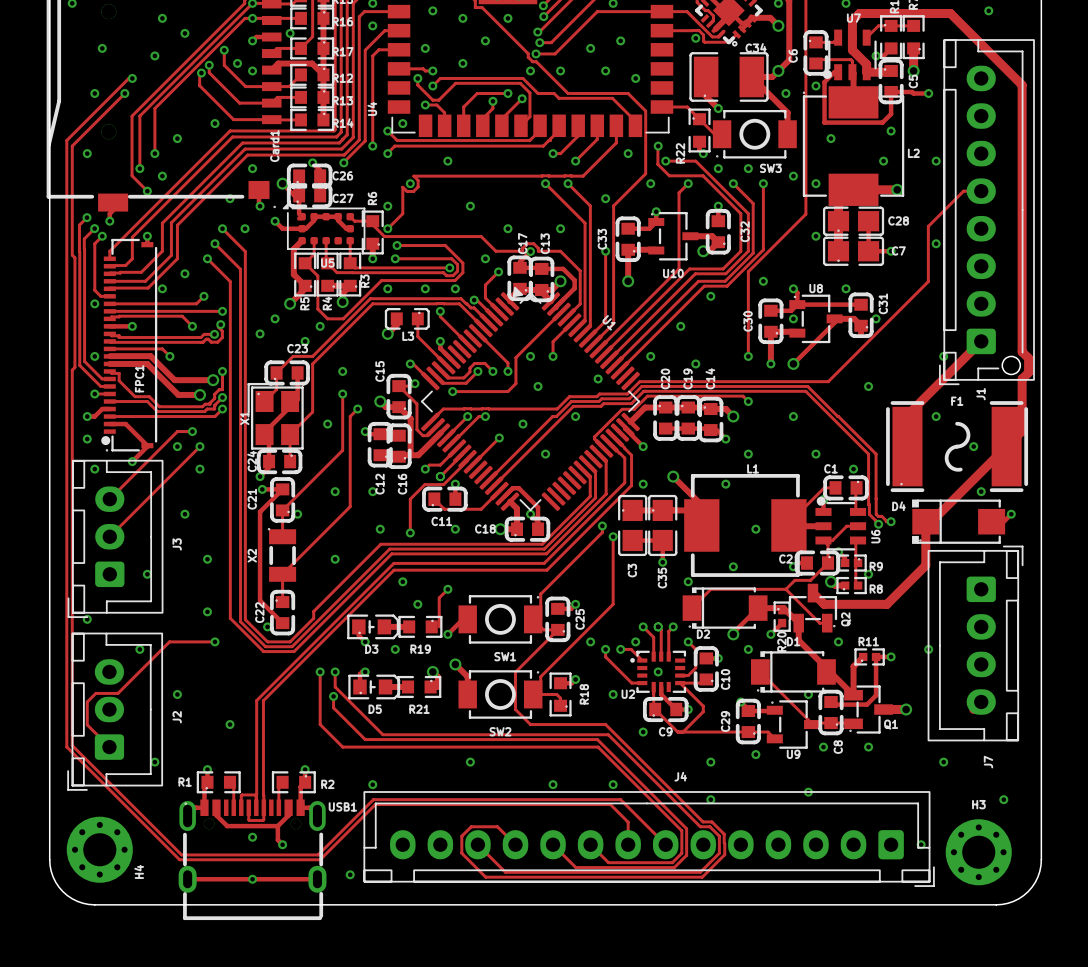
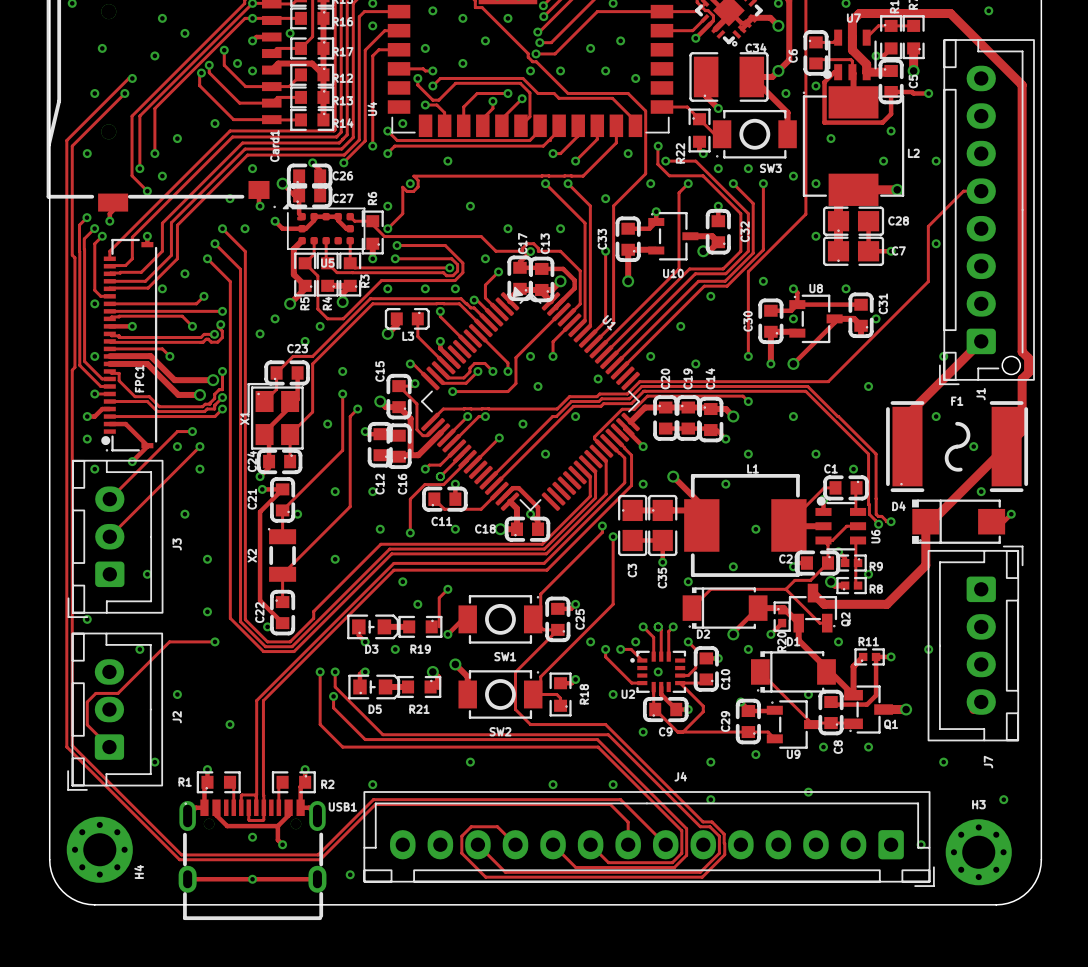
track: (687, 11) (712, 36) (718, 36) (724, 31) -> (687, 11) (697, 11) (705, 3)
track: none -> (710, 23) (695, 38)
track: (692, 30) (699, 30) (703, 35) (704, 42) (729, 42) (736, 34) -> (692, 30) (705, 17)

